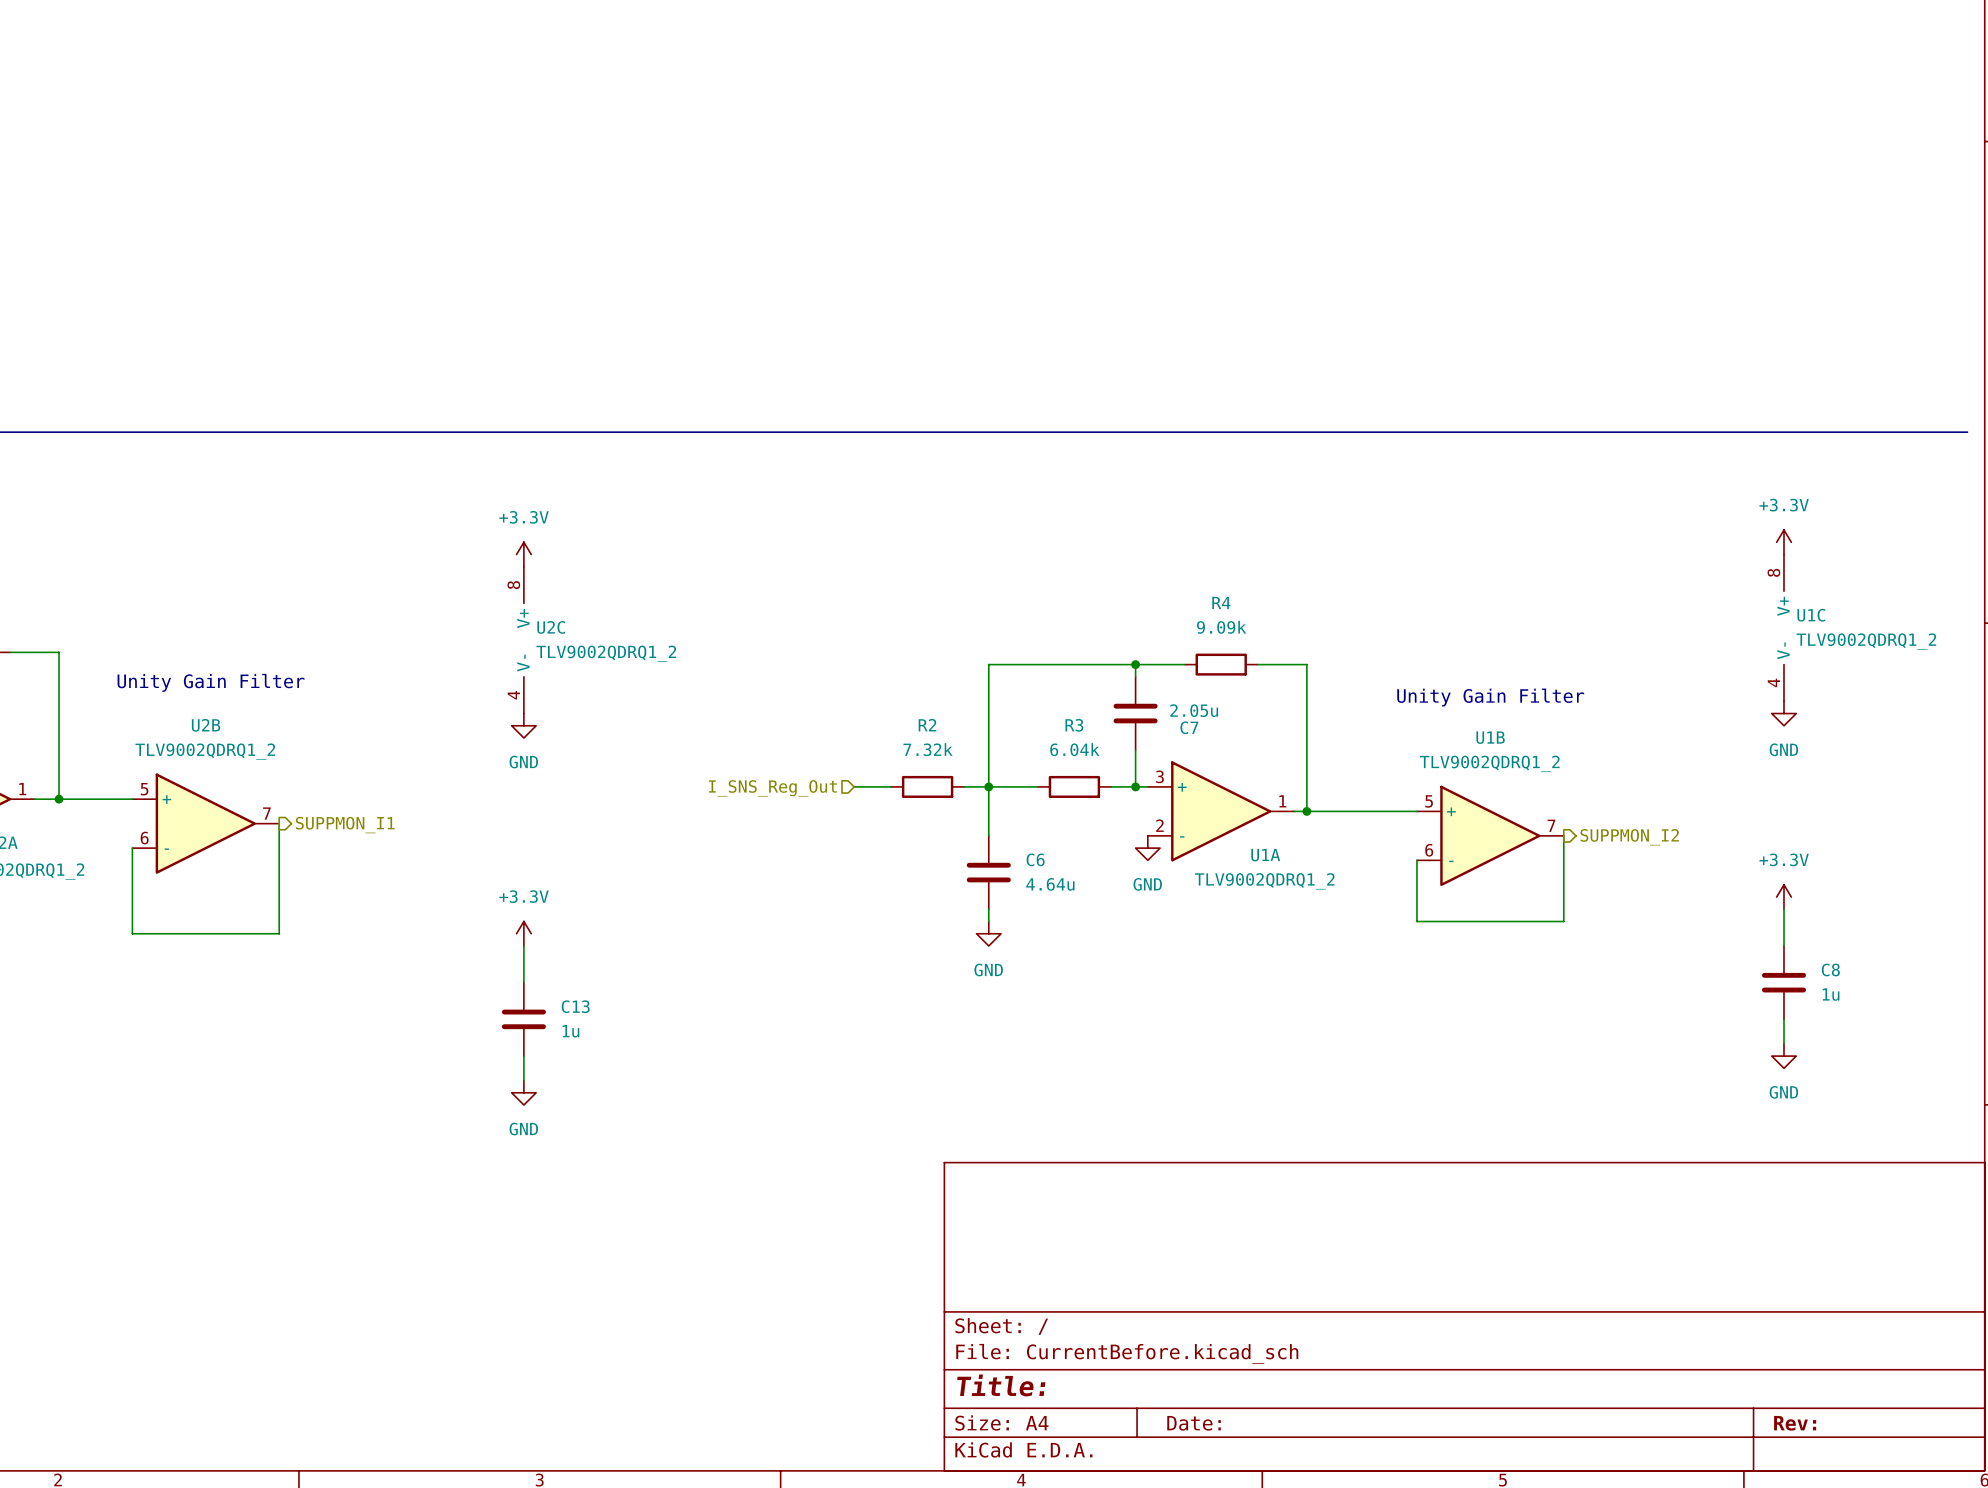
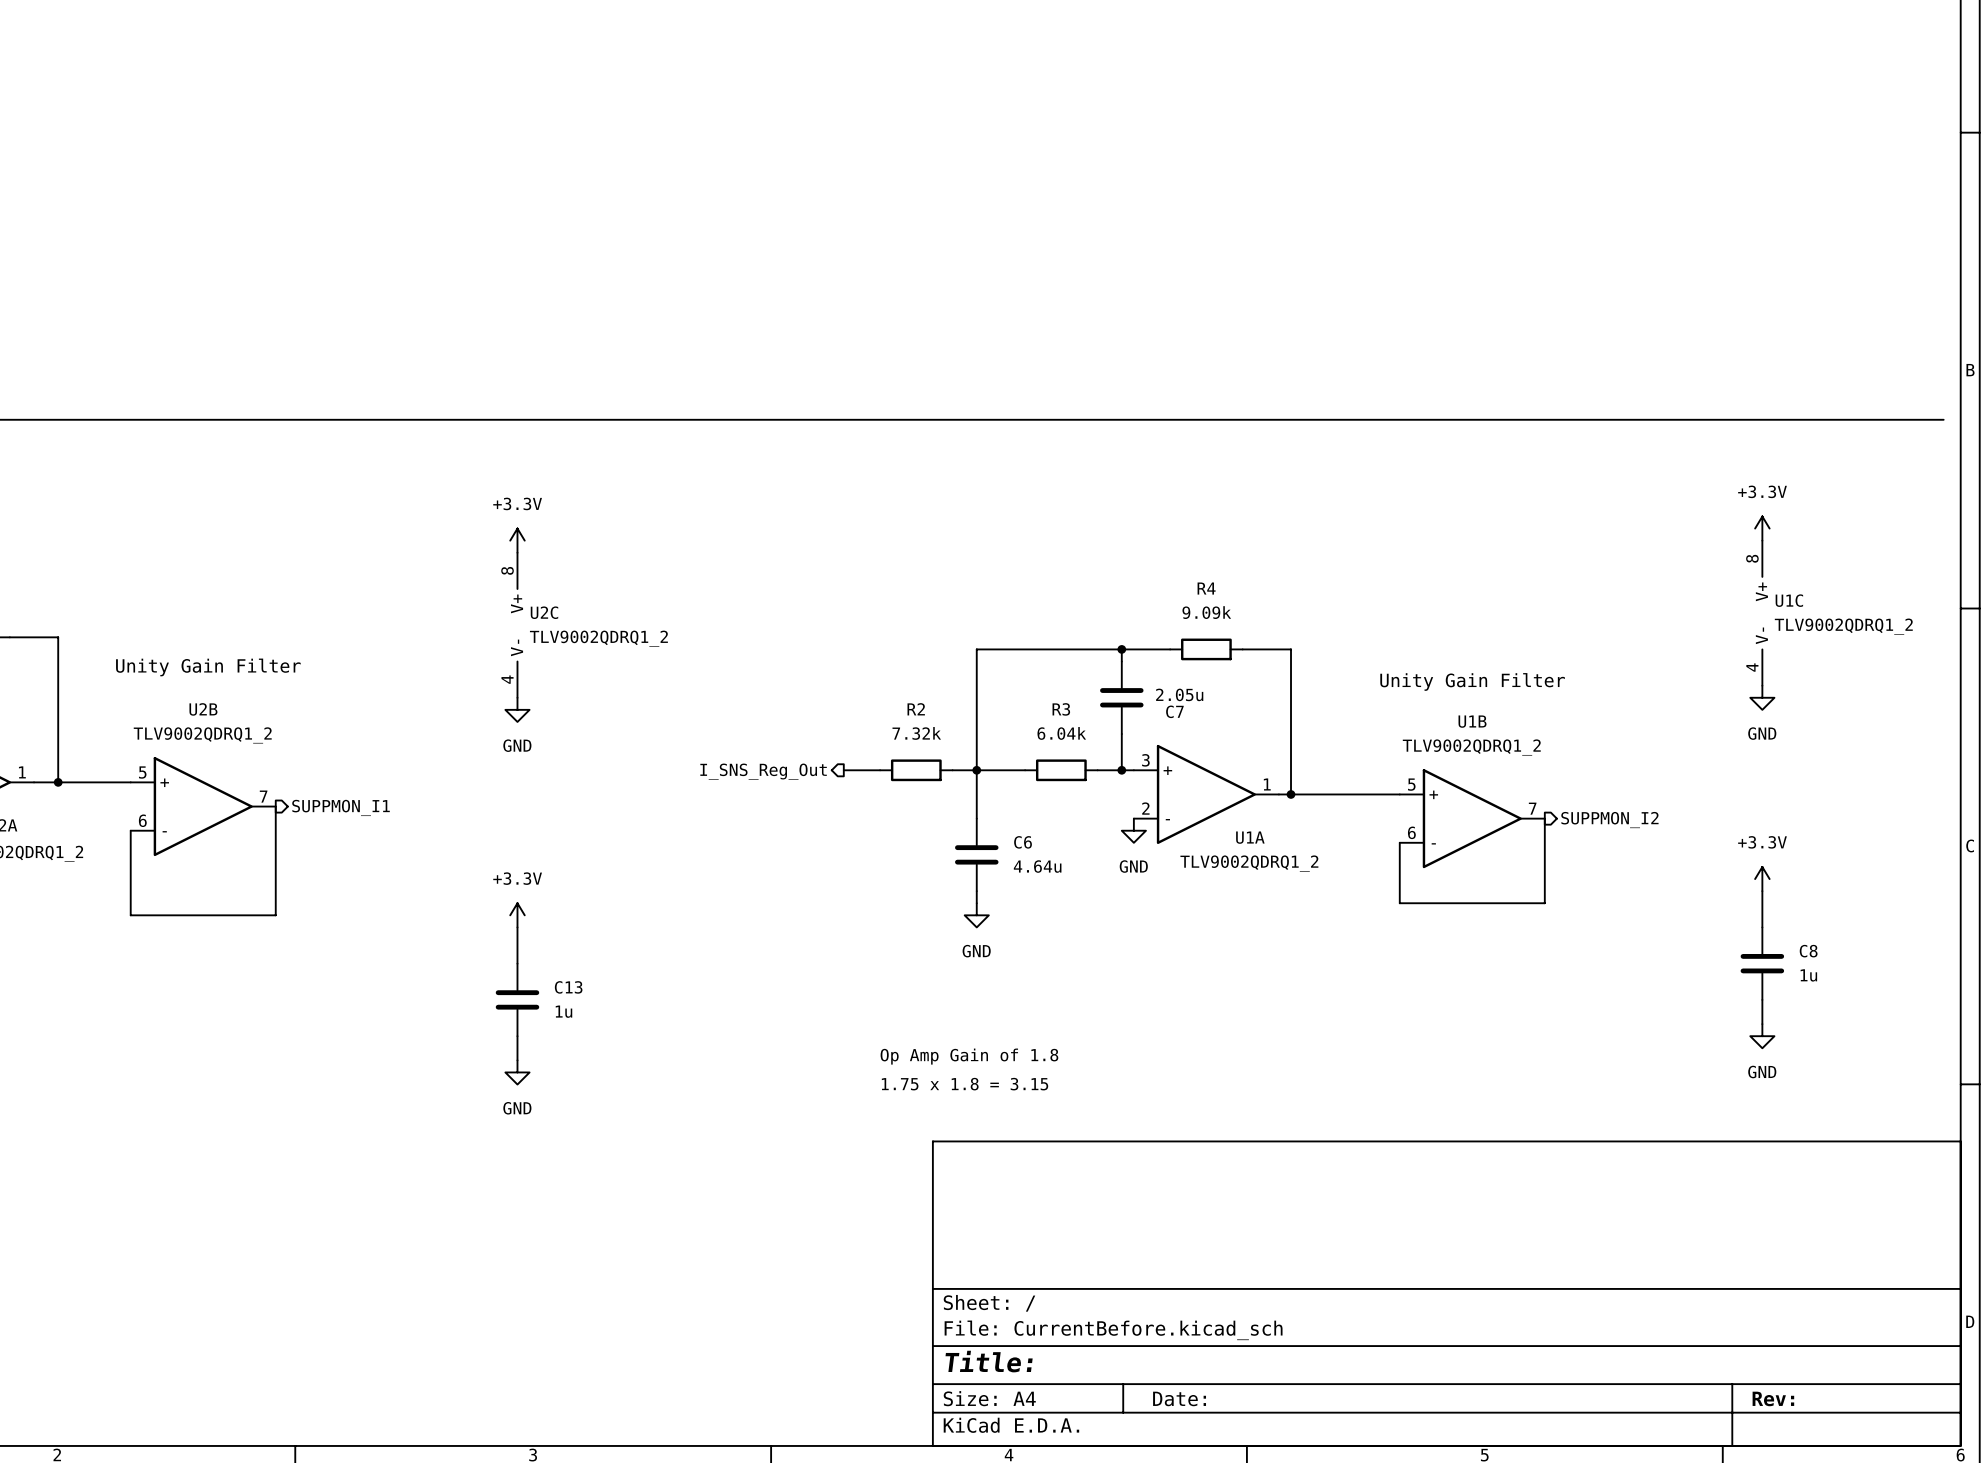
hierarchical label shape: input (773, 788) -> output (763, 771)
text: none -> Op Amp Gain of 1.8 (969, 1056)
text: none -> 1.75 x 1.8 = 3.15 (965, 1084)

